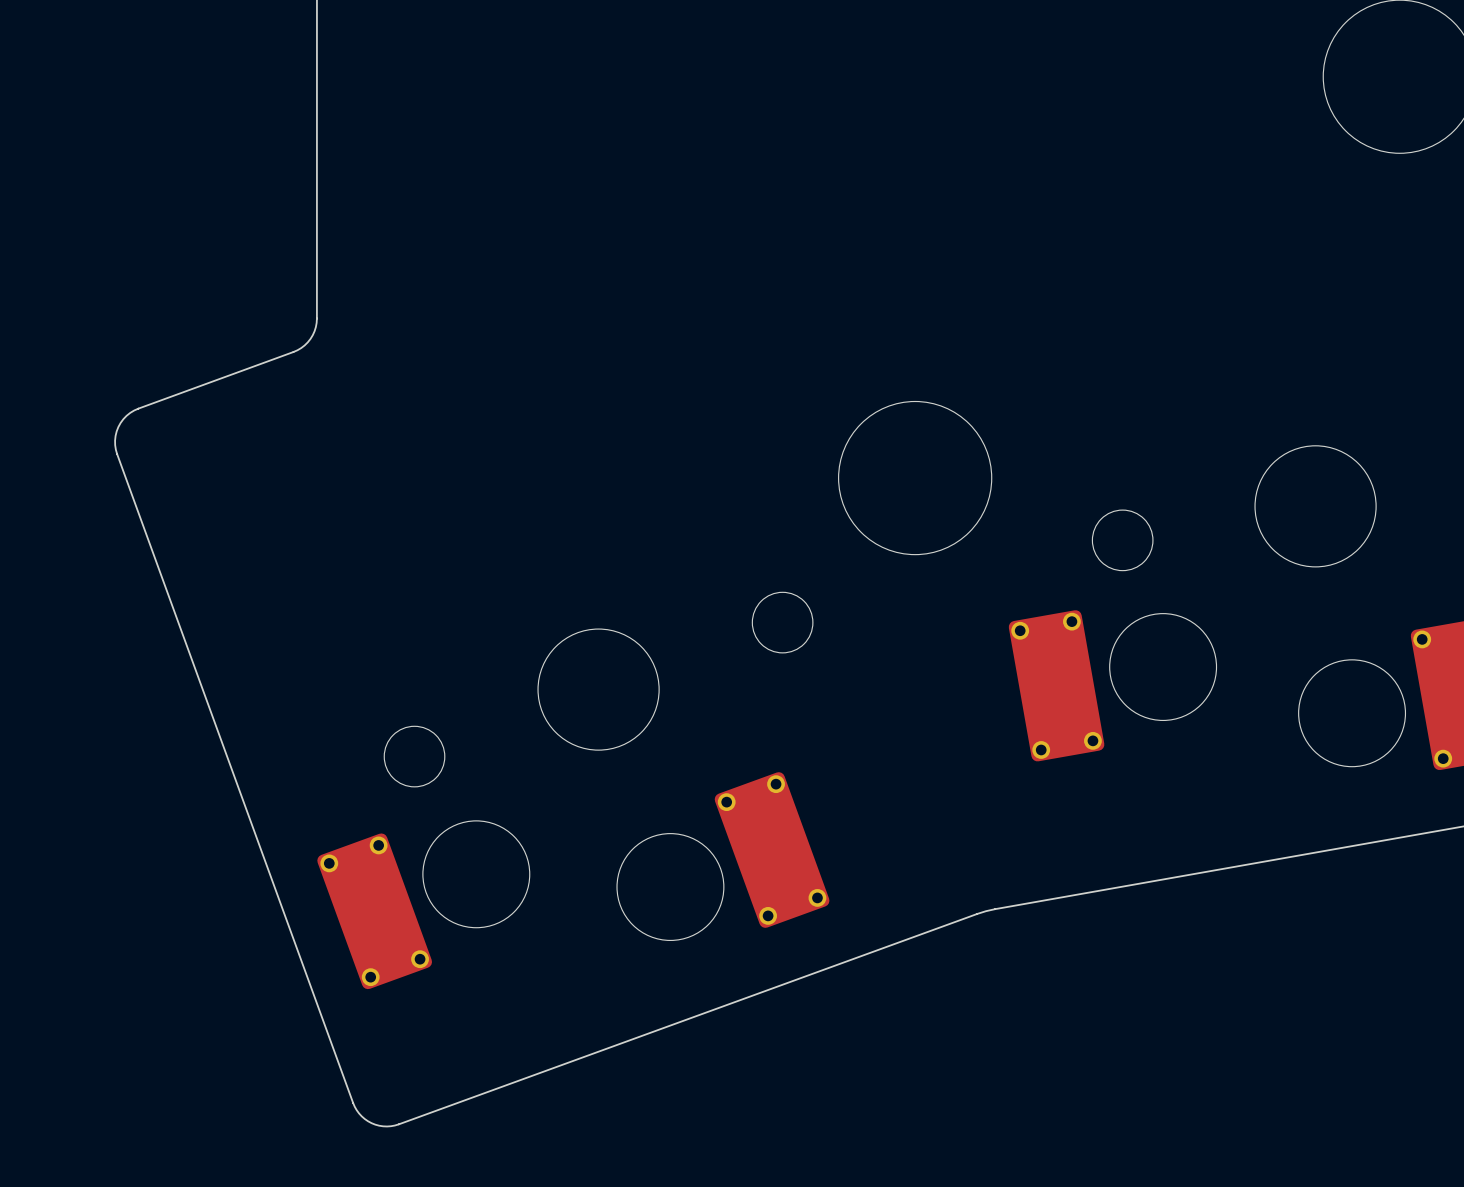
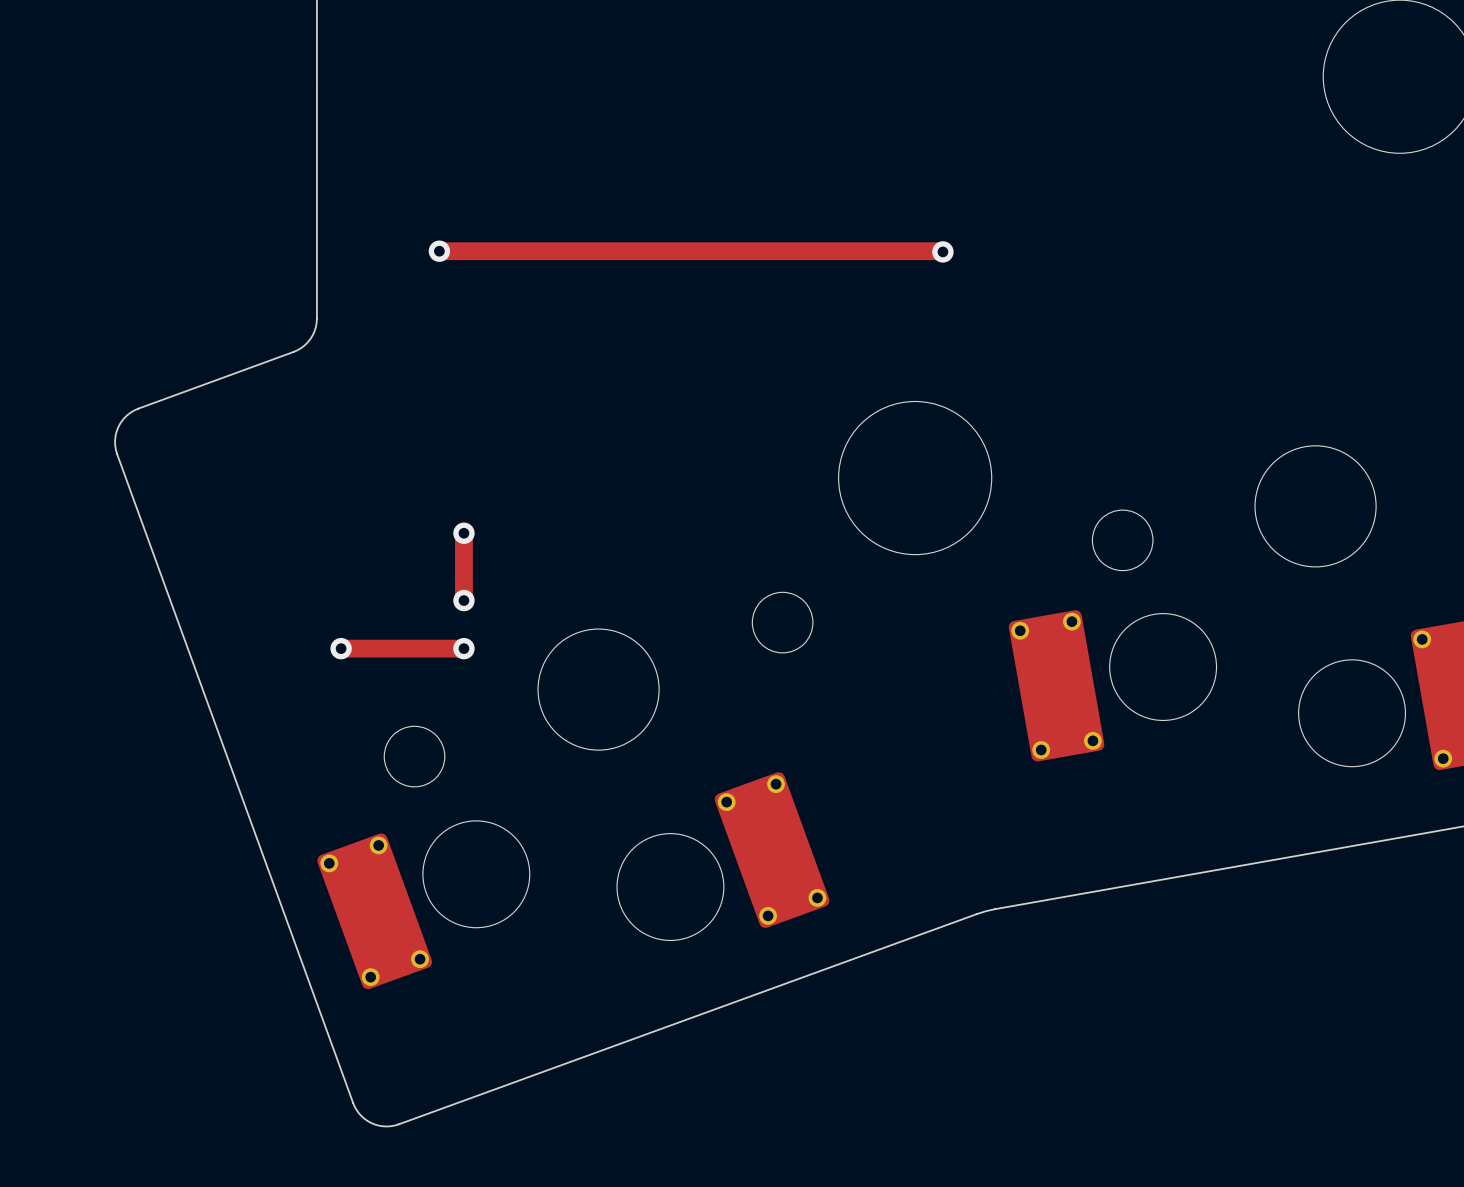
track: none -> (439, 251) (942, 251)
via: none -> (439, 251)
via: none -> (942, 251)
track: none -> (463, 533) (463, 600)
via: none -> (463, 533)
via: none -> (463, 600)
track: none -> (341, 648) (463, 648)
via: none -> (341, 648)
via: none -> (463, 648)

